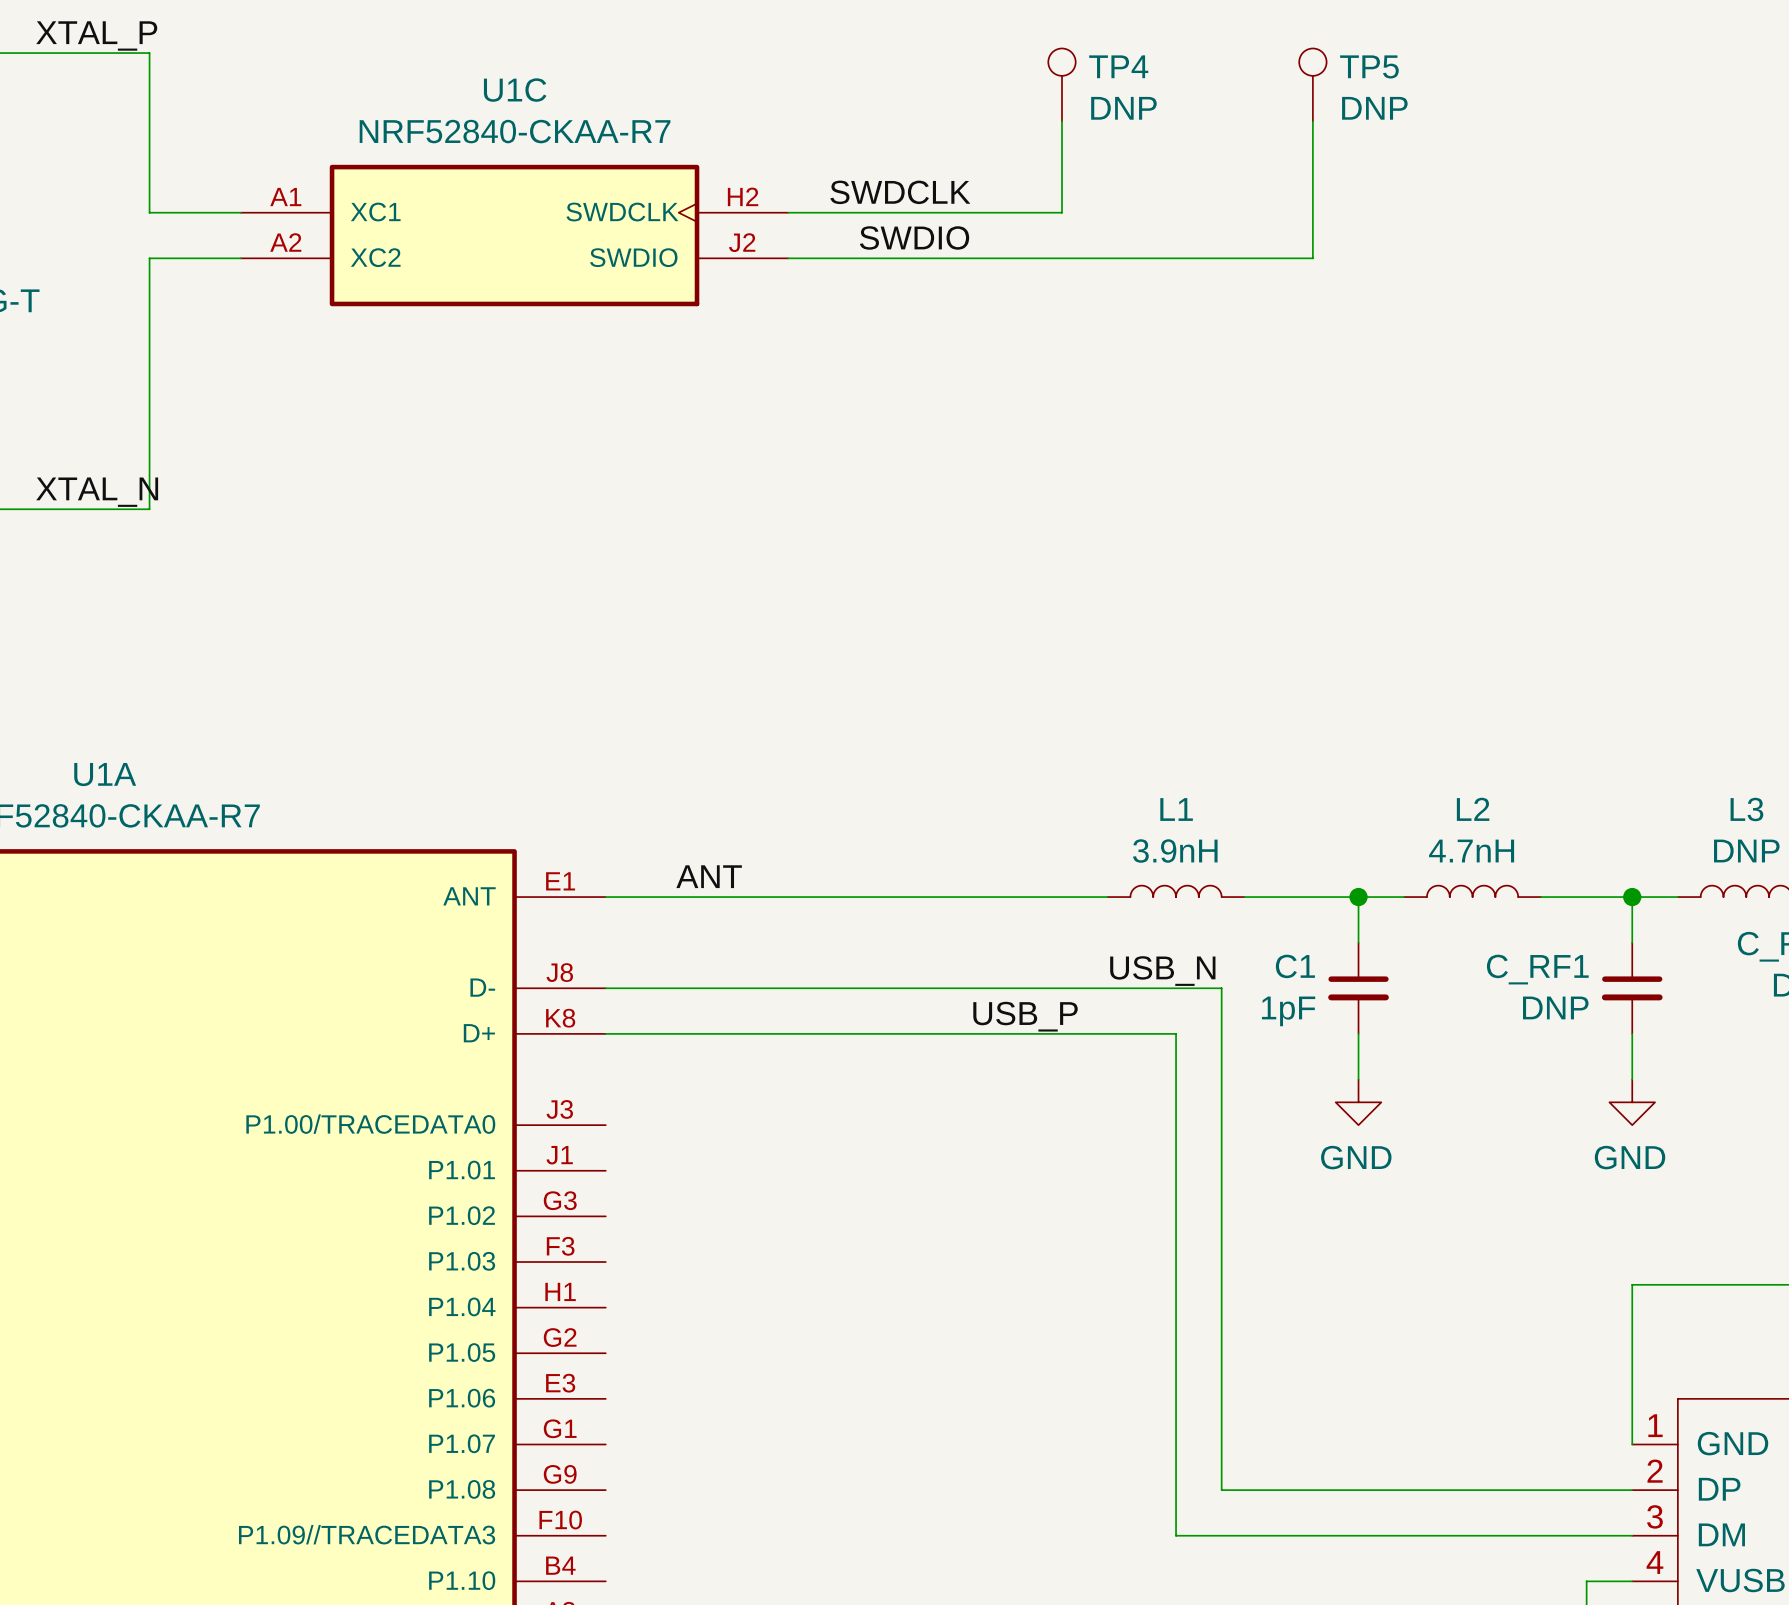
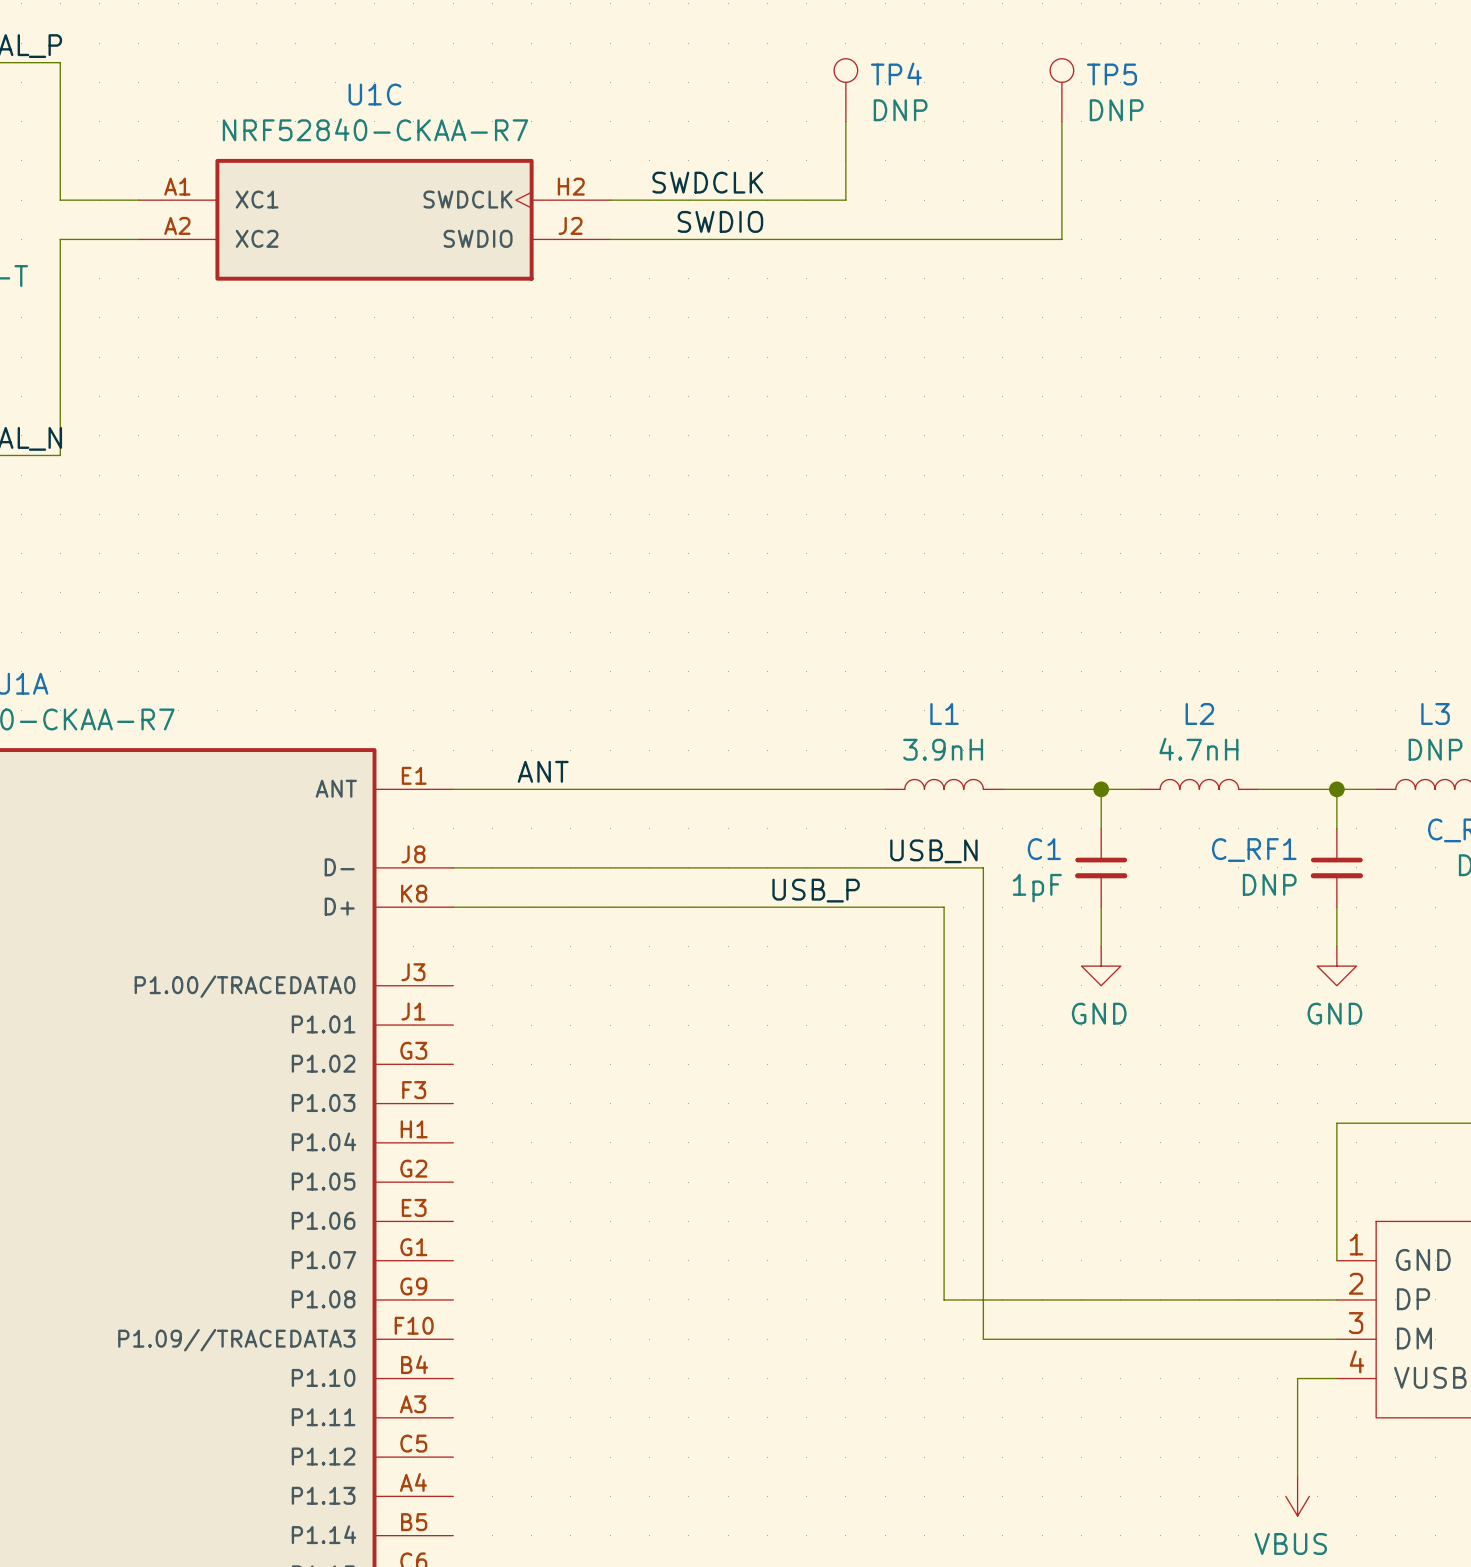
wire: (1176, 1490) (1176, 1535) (1221, 1535) -> (944, 1299) (983, 1299) (983, 1339)

